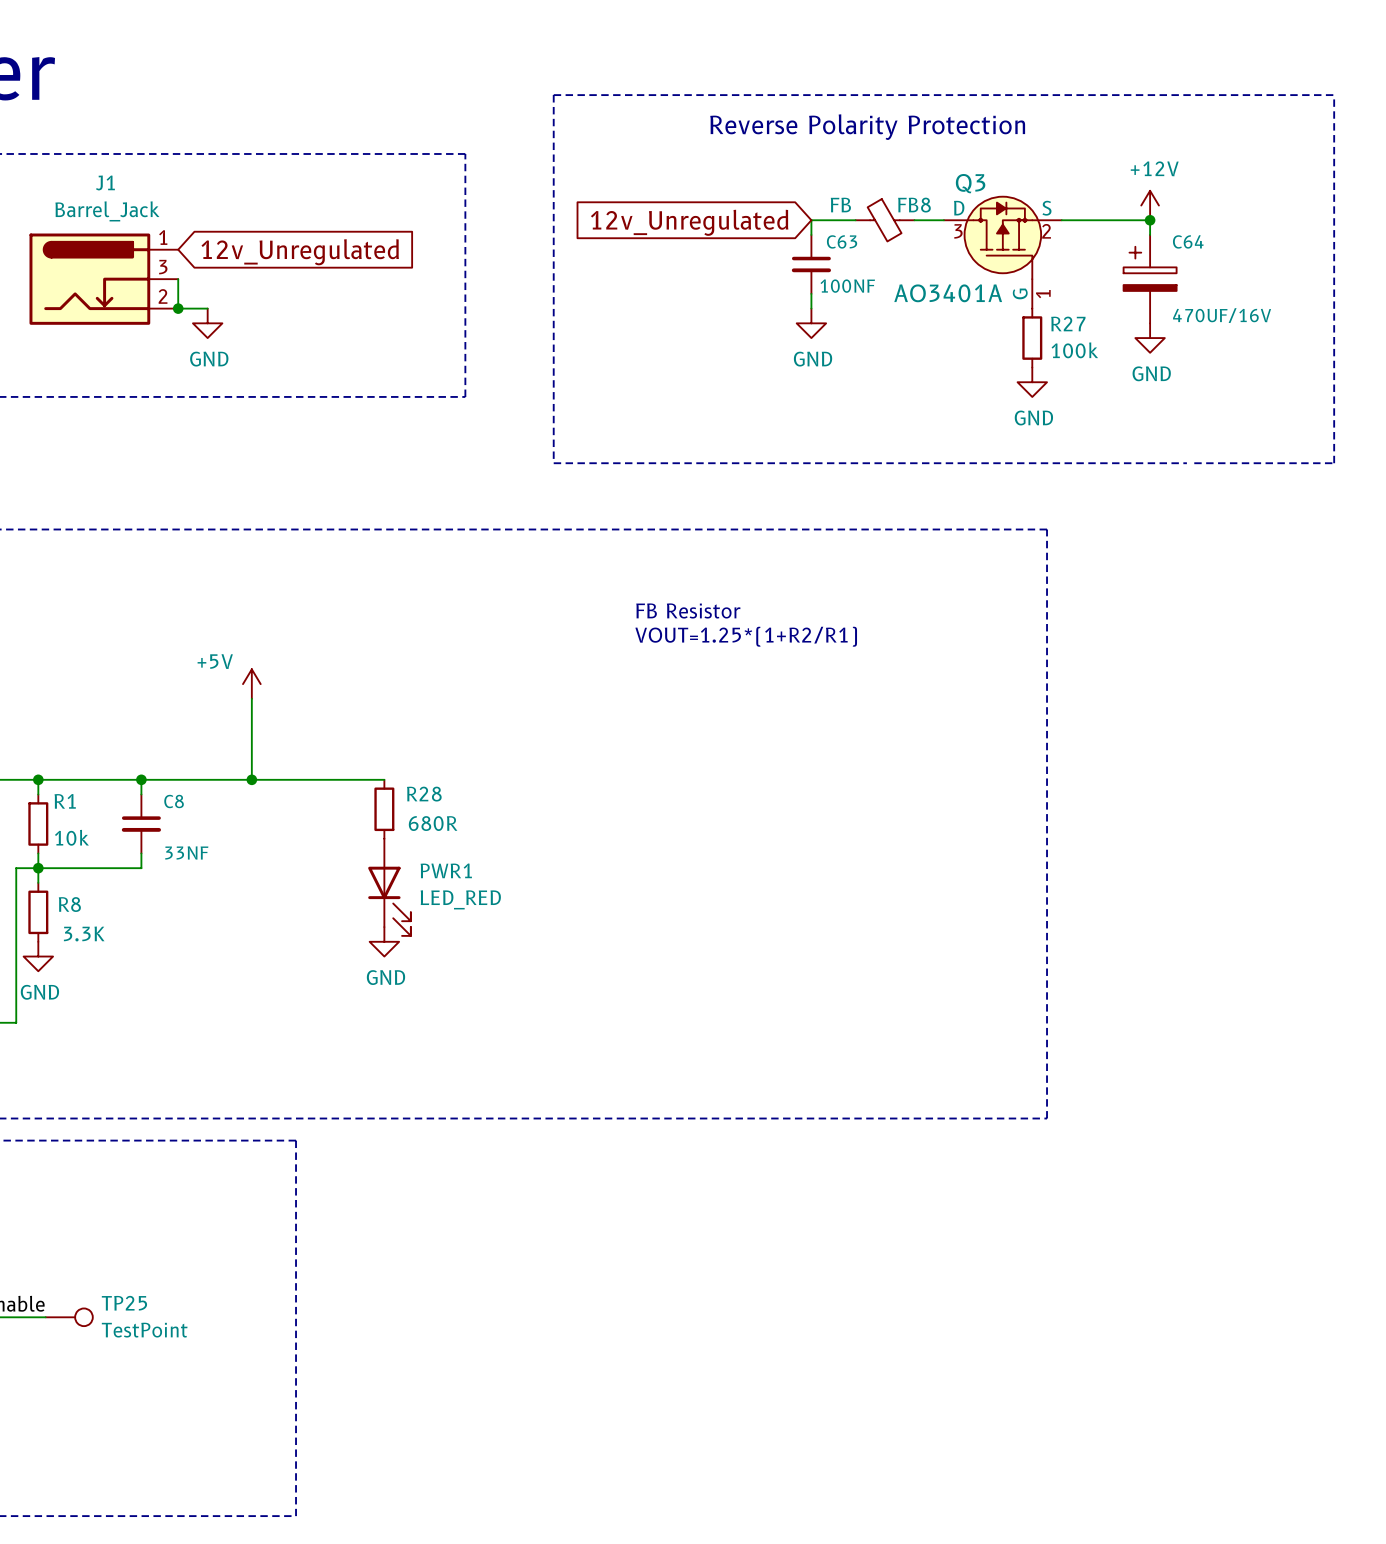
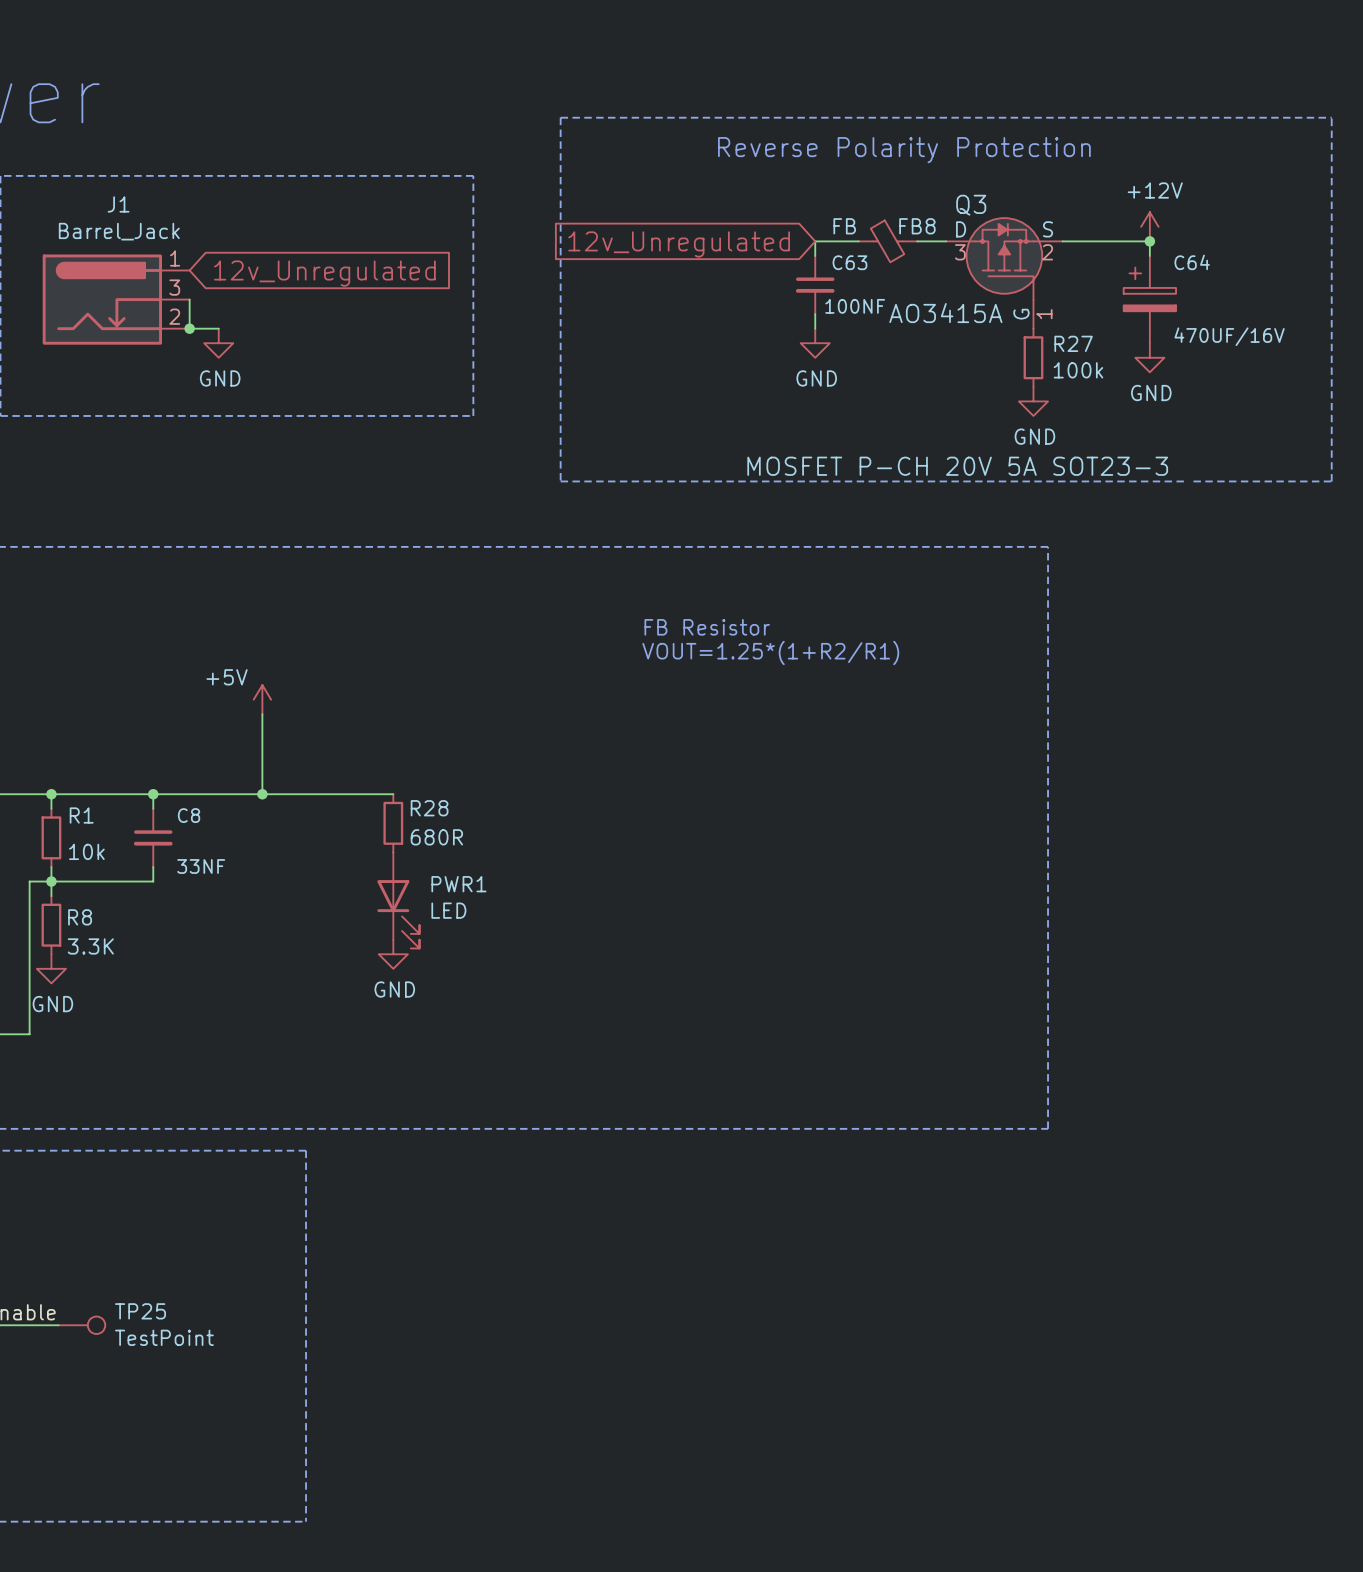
Q3 value: AO3401A (948, 293) -> AO3415A (945, 313)
Q3 text: none -> MOSFET P-CH 20V 5A SOT23-3 (957, 466)
PWR1 value: LED_RED (460, 899) -> LED (448, 910)

